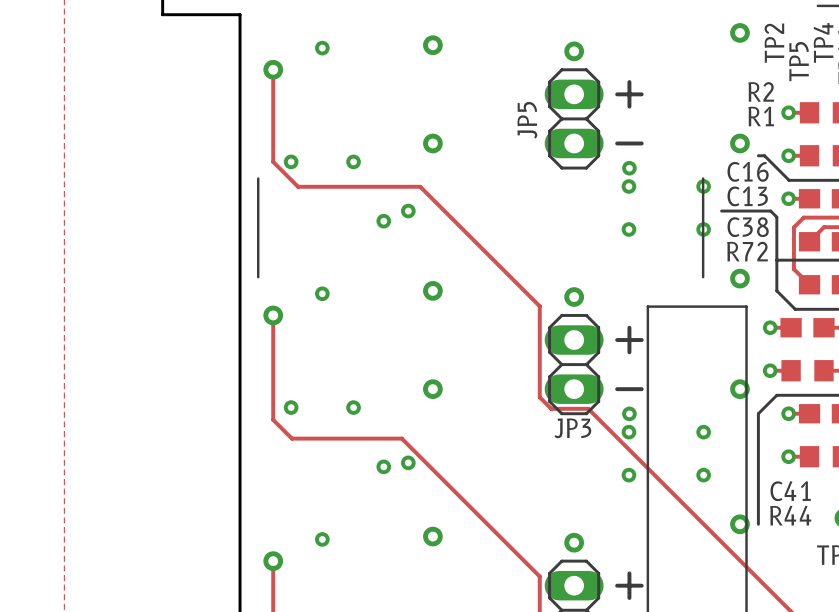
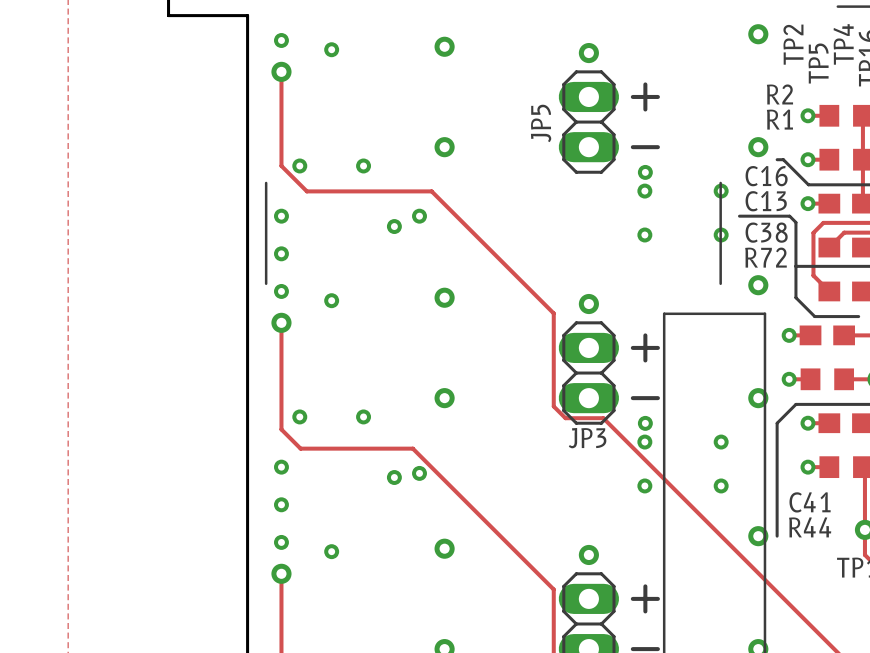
via: none -> (281, 40)
via: none -> (281, 216)
via: none -> (281, 253)
via: none -> (281, 291)
via: none -> (281, 467)
via: none -> (281, 504)
via: none -> (281, 542)

